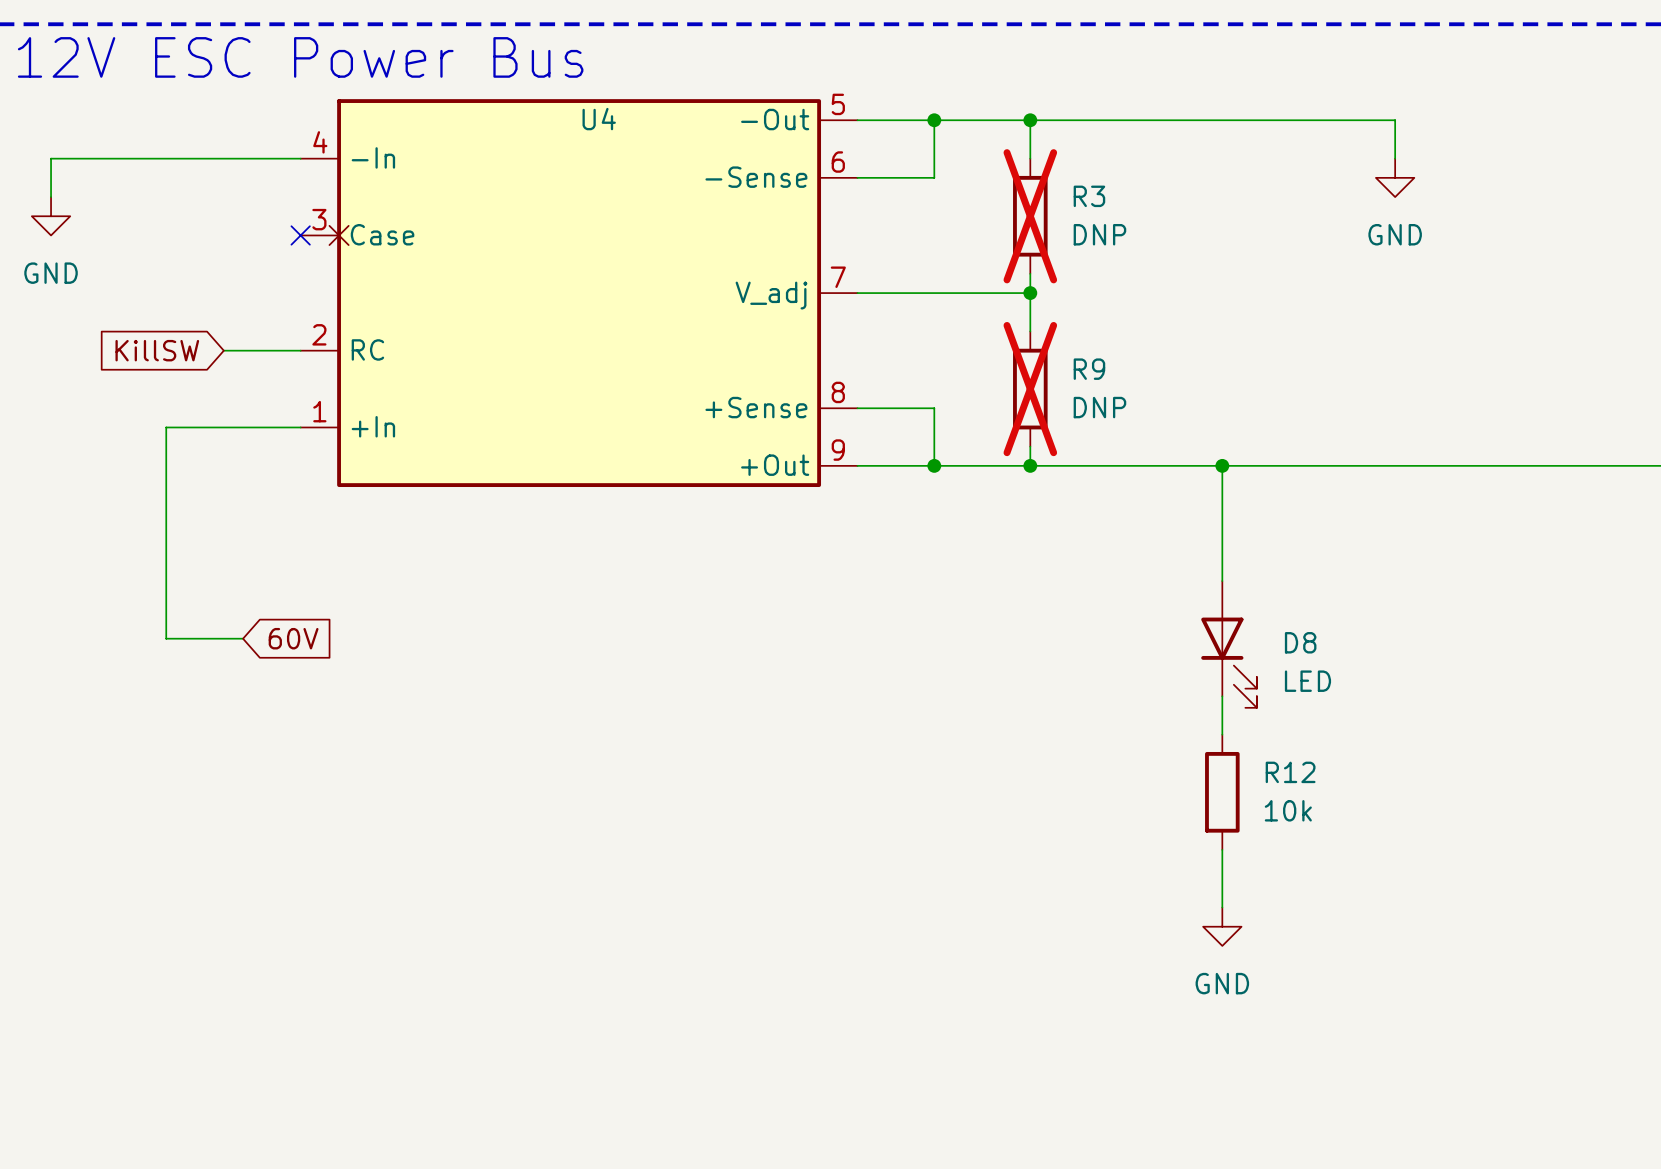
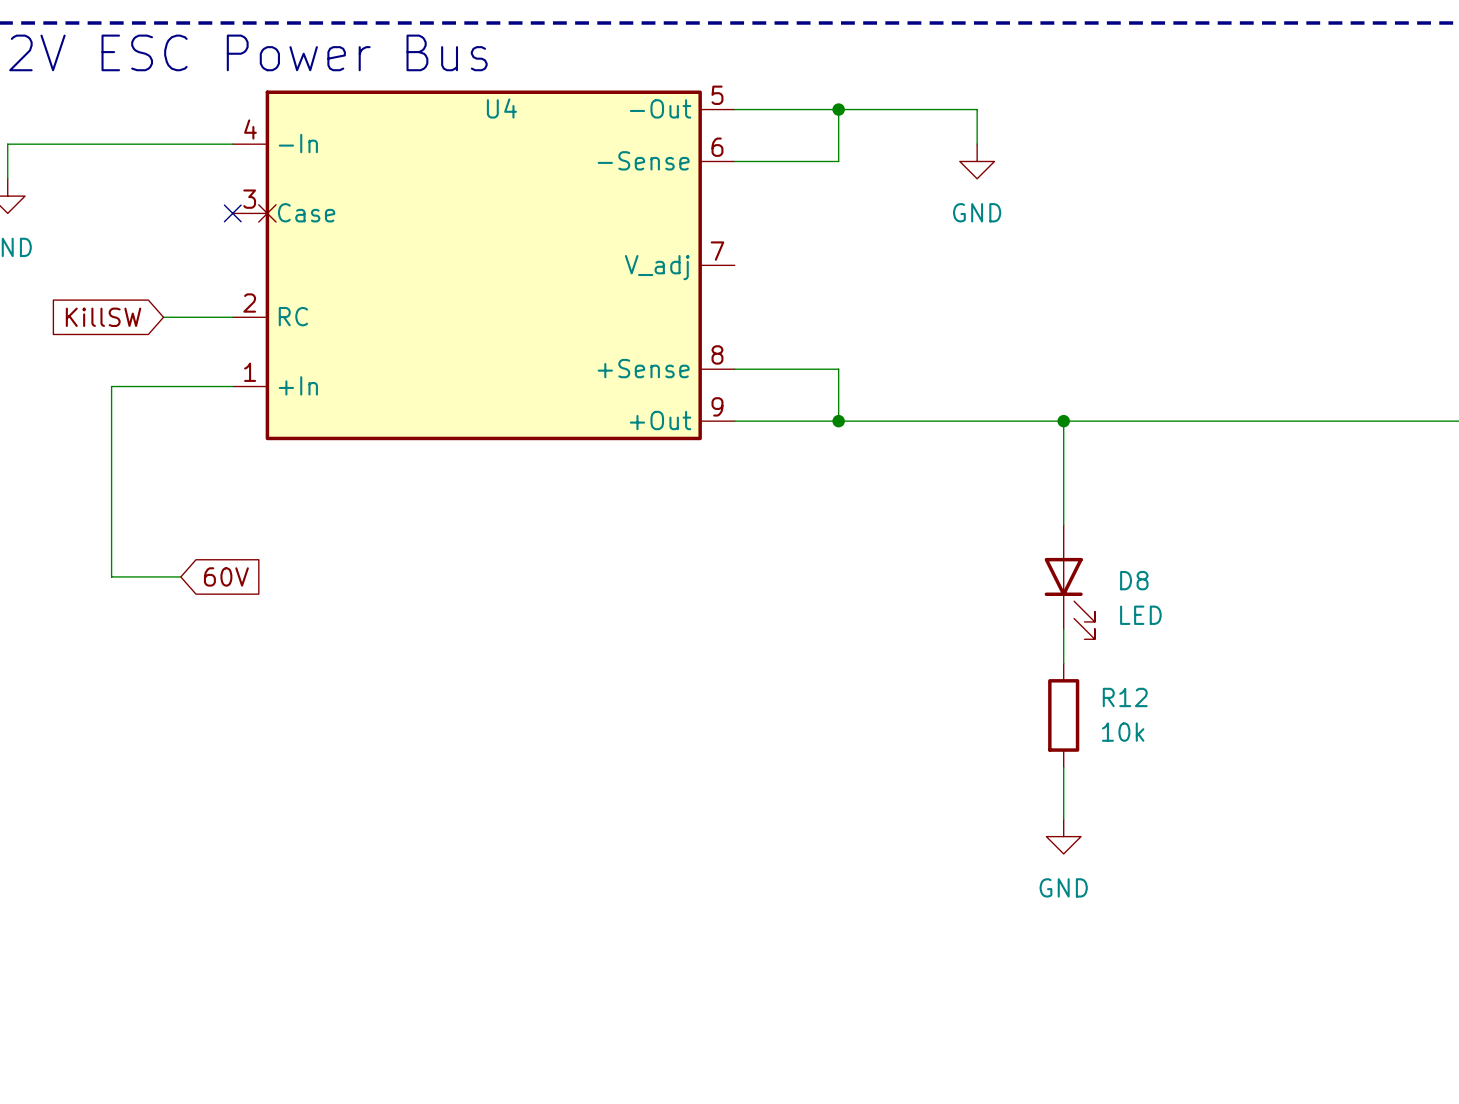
wire: (934, 120) (934, 177) -> (838, 109) (838, 161) (804, 161)
junction: (934, 120) -> none
junction: none -> (838, 109)
wire: (1030, 120) (1030, 158) -> none
junction: (1030, 120) -> none
wire: (1126, 120) (1395, 120) (1395, 158) -> (977, 109) (977, 144)
power symbol position: GND (1395, 177) -> GND (977, 161)
R3: DNP (1030, 216) -> none
wire: (1030, 273) (1030, 331) -> none
wire: (857, 293) (1030, 293) -> none
junction: (1030, 293) -> none
R9: DNP (1030, 389) -> none
wire: (934, 408) (934, 465) -> (804, 369) (838, 369) (838, 421)
wire: (1030, 446) (1030, 465) -> none
junction: (934, 465) -> none
junction: none -> (838, 421)
junction: (1030, 465) -> none

